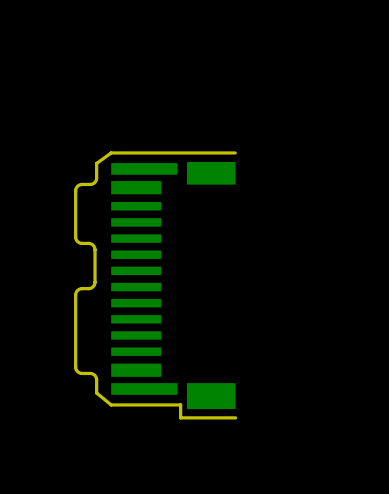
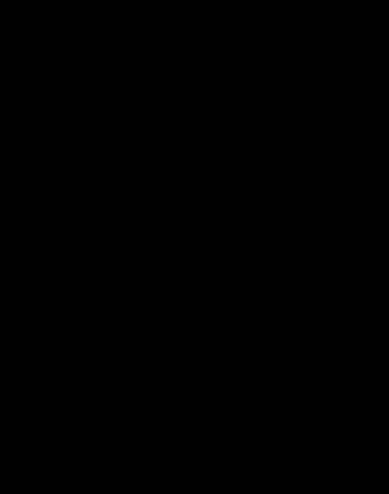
part: (155, 285) -> none

